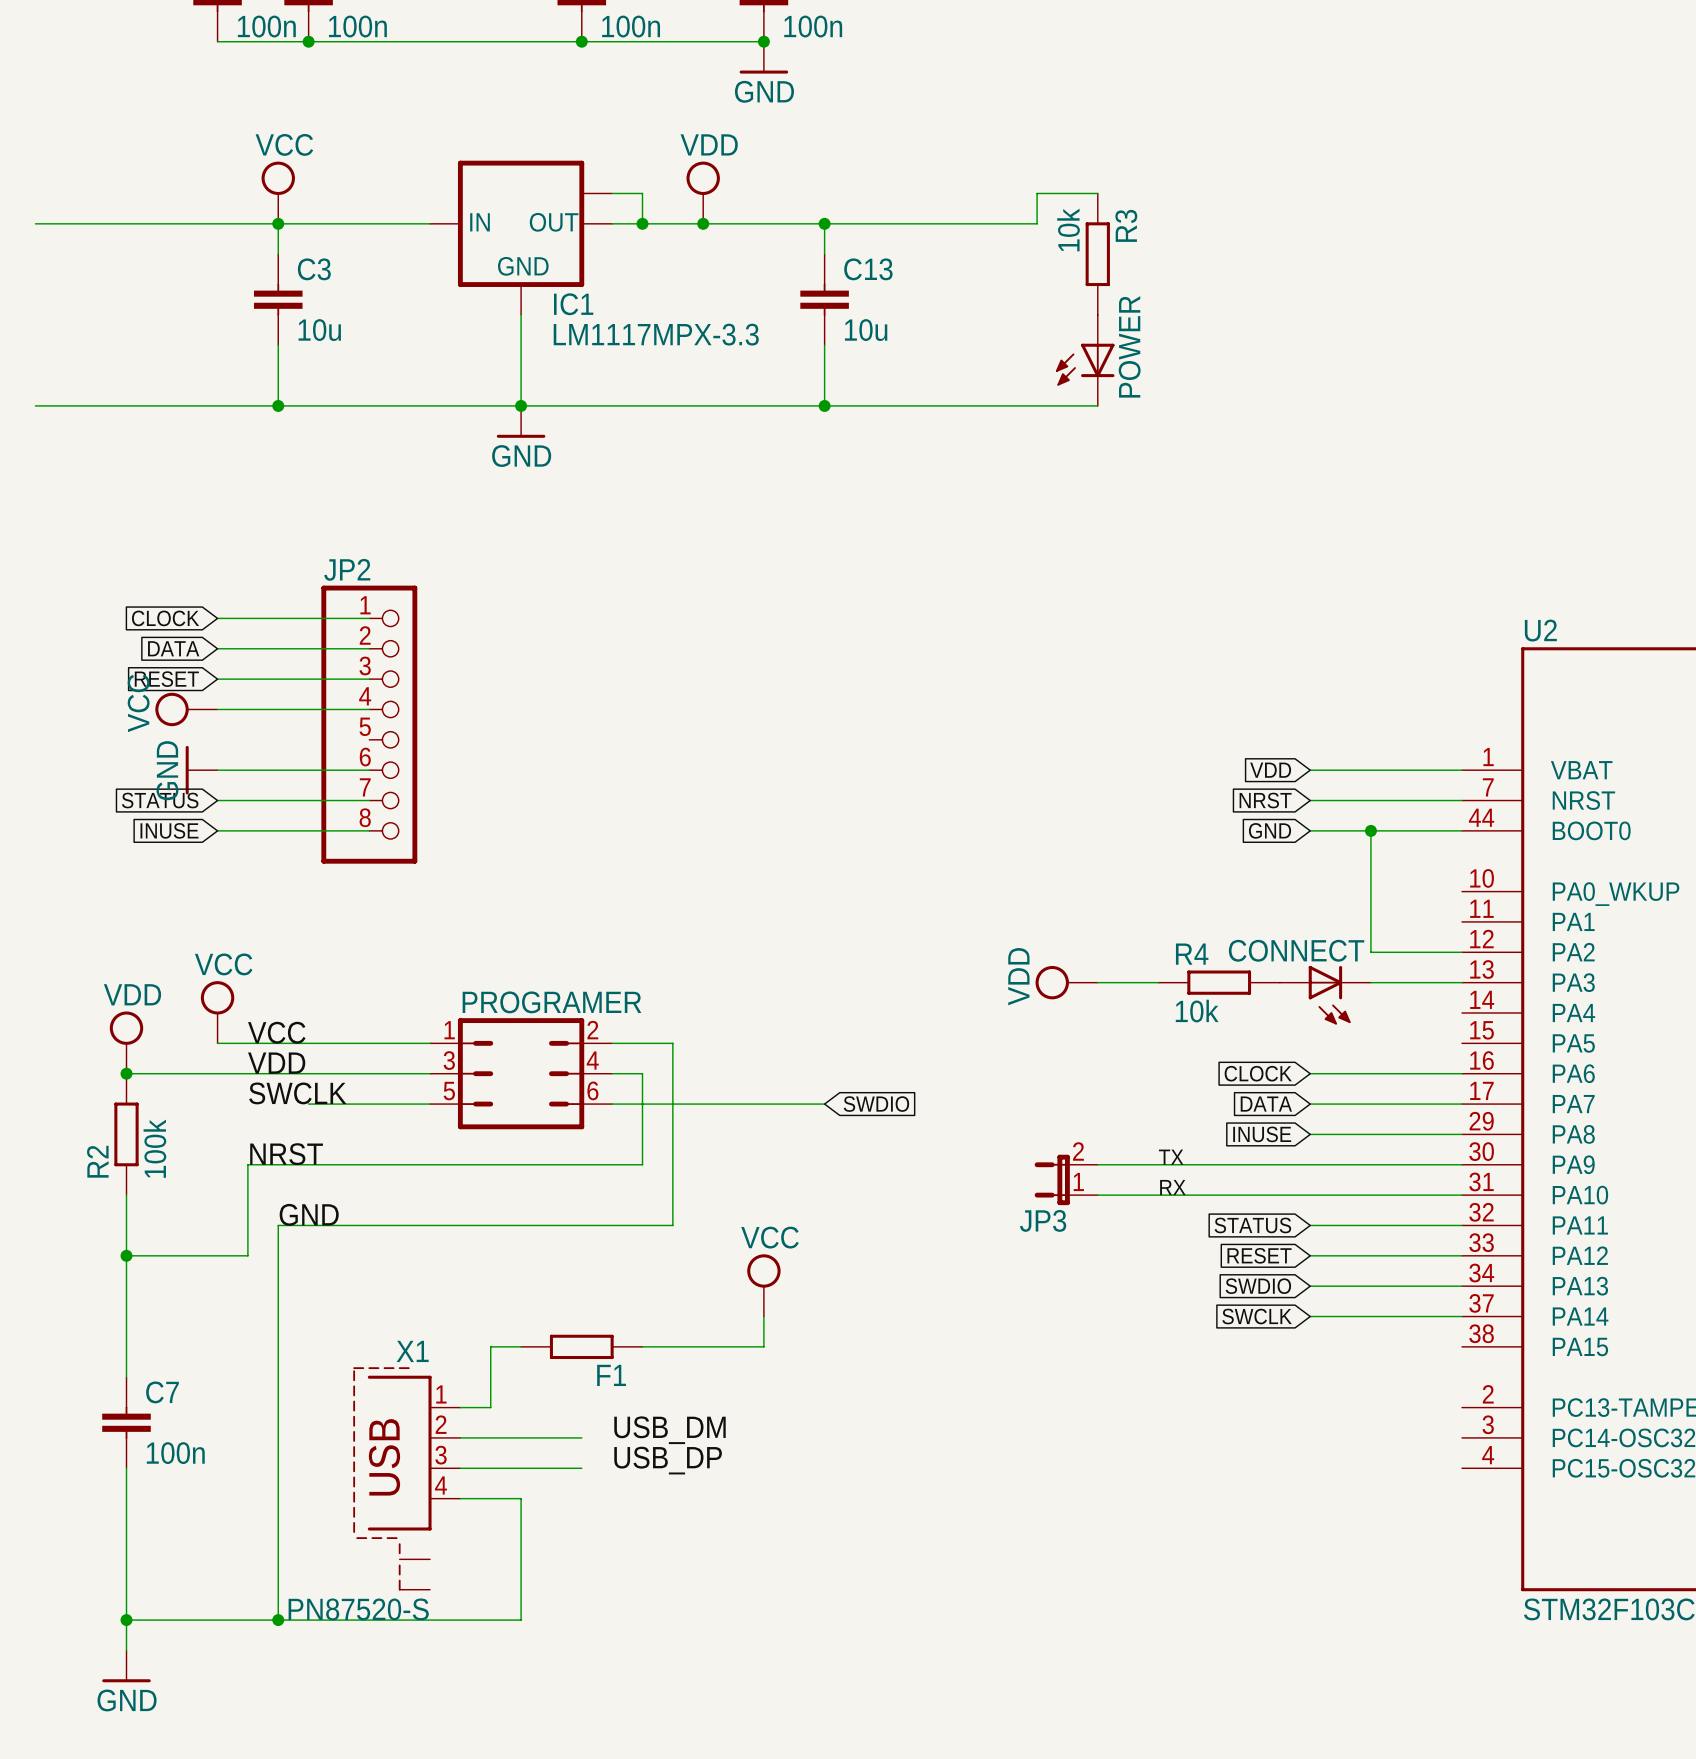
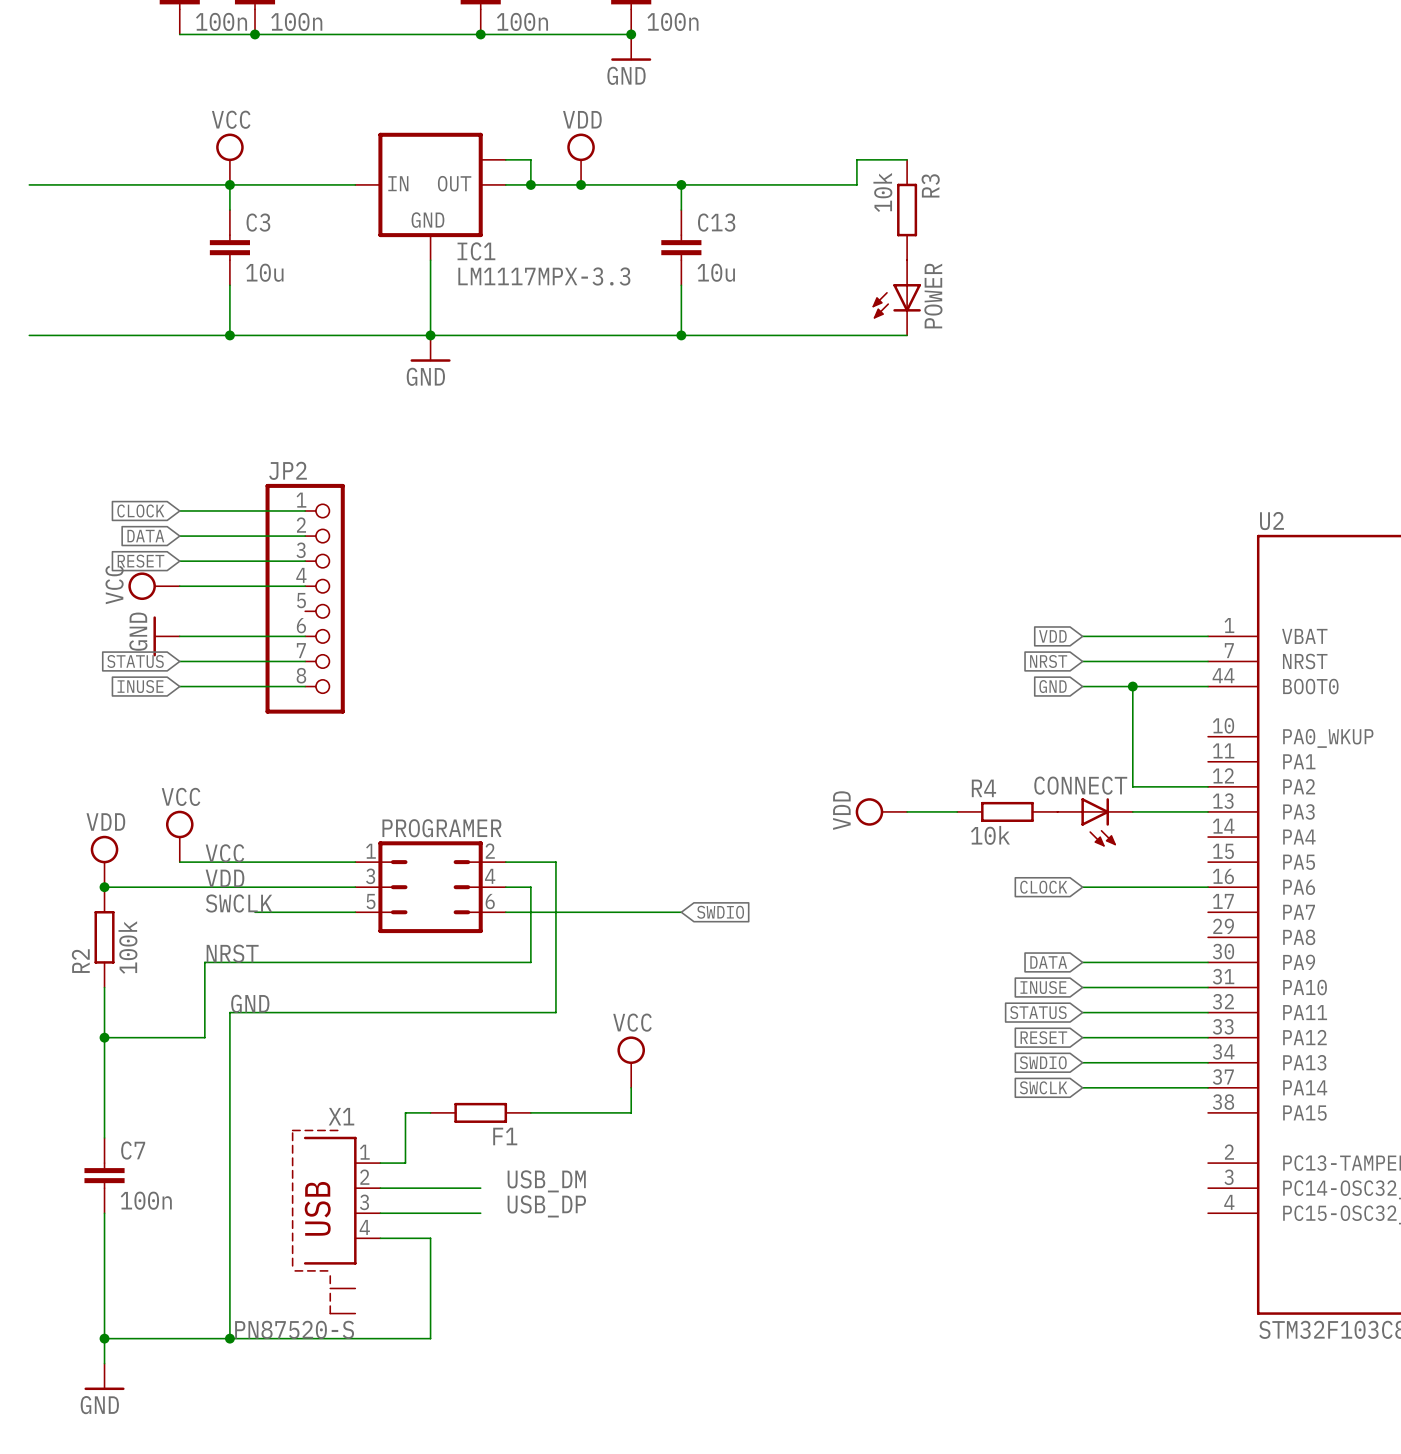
global label position: DATA (1266, 1104) -> DATA (1048, 962)
wire: (1310, 1104) (1462, 1104) -> none
global label position: INUSE (1262, 1134) -> INUSE (1043, 987)
wire: (1310, 1134) (1462, 1134) -> none
label: TX (1171, 1157) -> none
wire: (1097, 1164) (1310, 1164) -> none
JP3: (1066, 1179) -> none
label: RX (1172, 1187) -> none
wire: (1097, 1195) (1310, 1195) -> none

